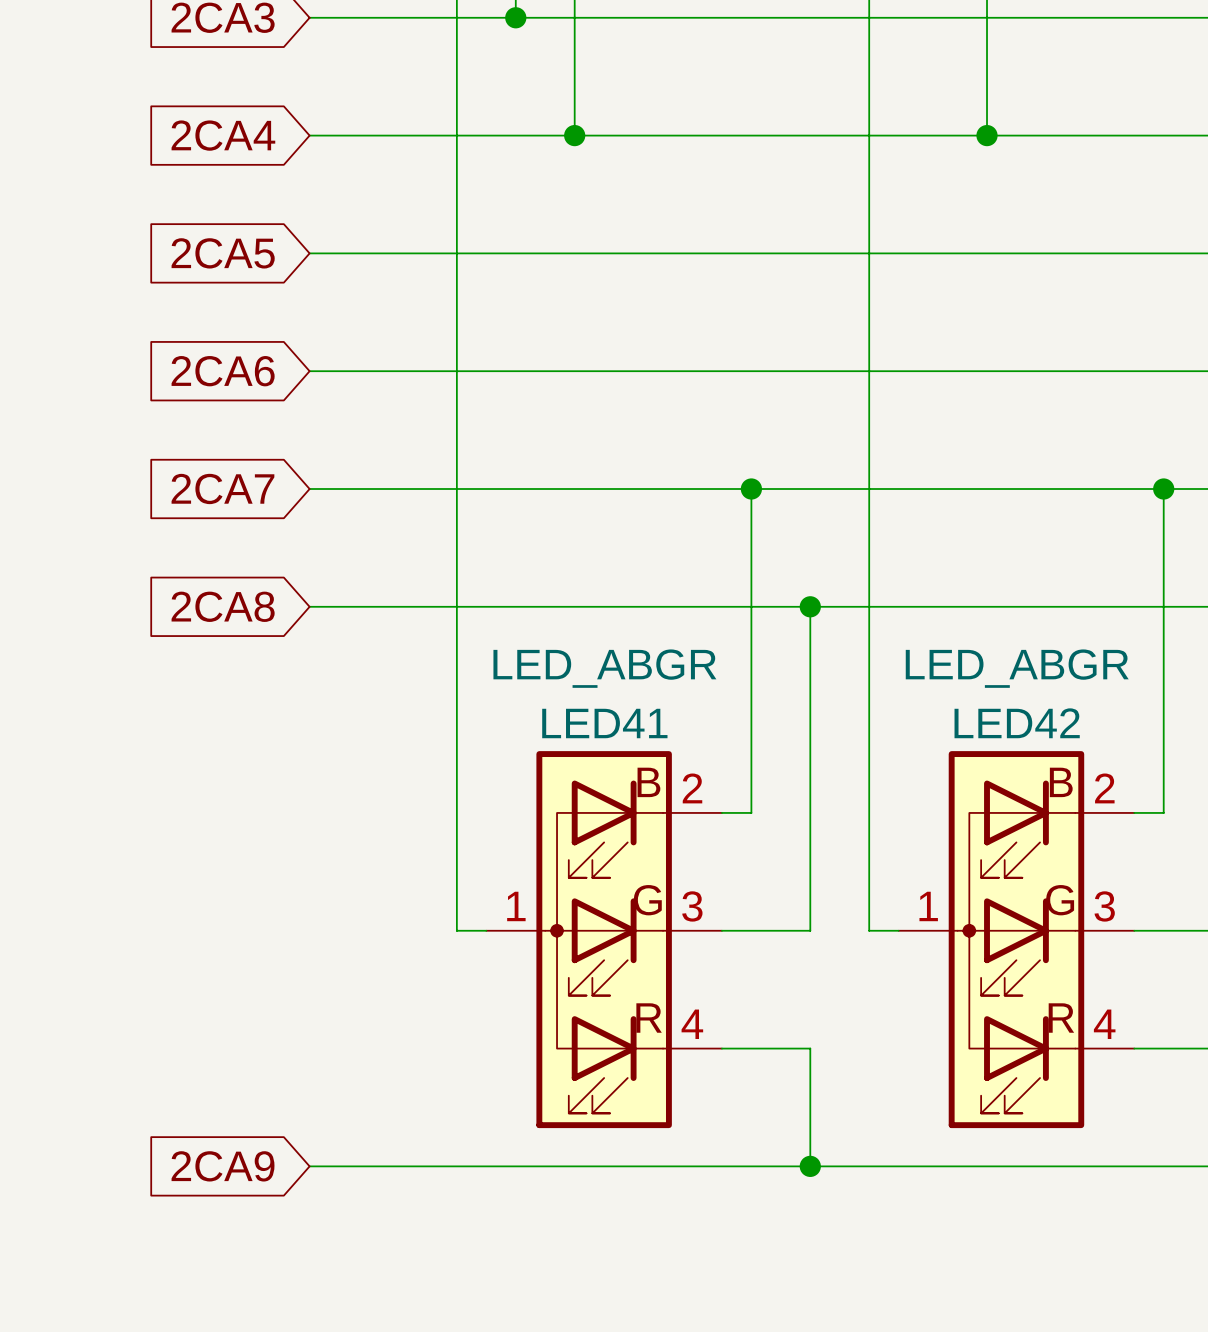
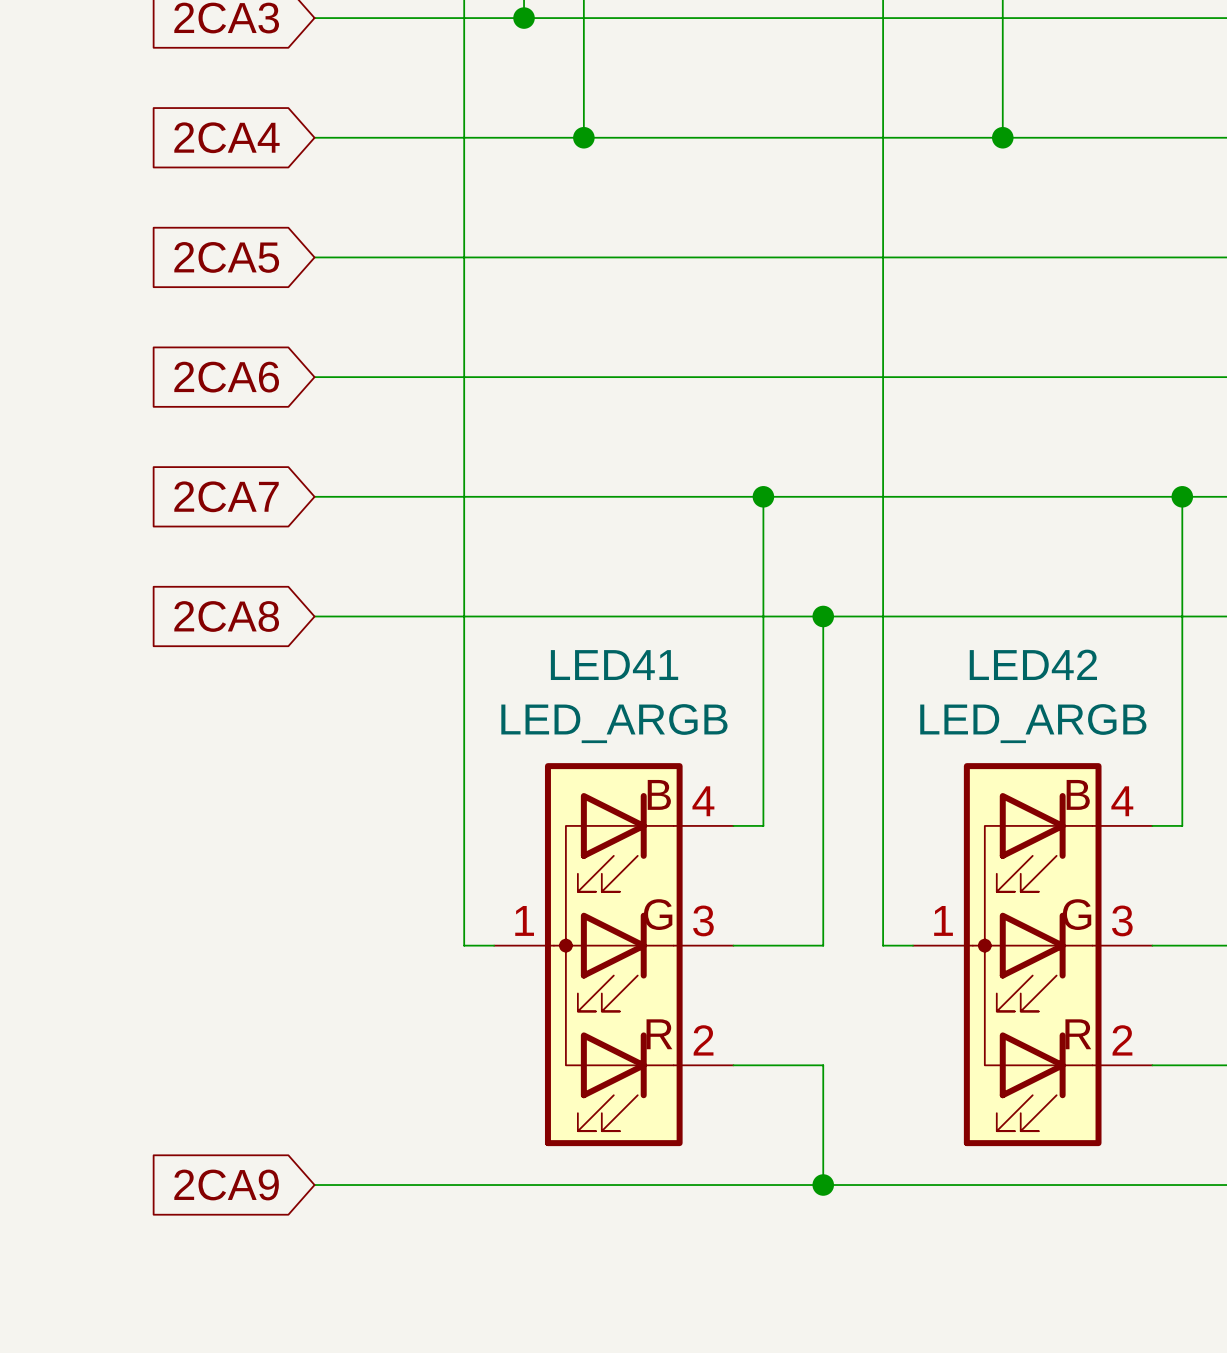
LED41 value: LED_ABGR (604, 668) -> LED_ARGB (614, 723)
LED42 value: LED_ABGR (1017, 668) -> LED_ARGB (1033, 723)
LED41 name position: LED41 (604, 723) -> LED41 (614, 665)
LED42 name position: LED42 (1017, 723) -> LED42 (1033, 664)
LED41 pin number: 2 (692, 788) -> 4 (703, 801)
LED42 pin number: 2 (1104, 788) -> 4 (1122, 801)
LED41 pin number: 4 (692, 1024) -> 2 (703, 1040)
LED42 pin number: 4 (1104, 1024) -> 2 (1122, 1040)

